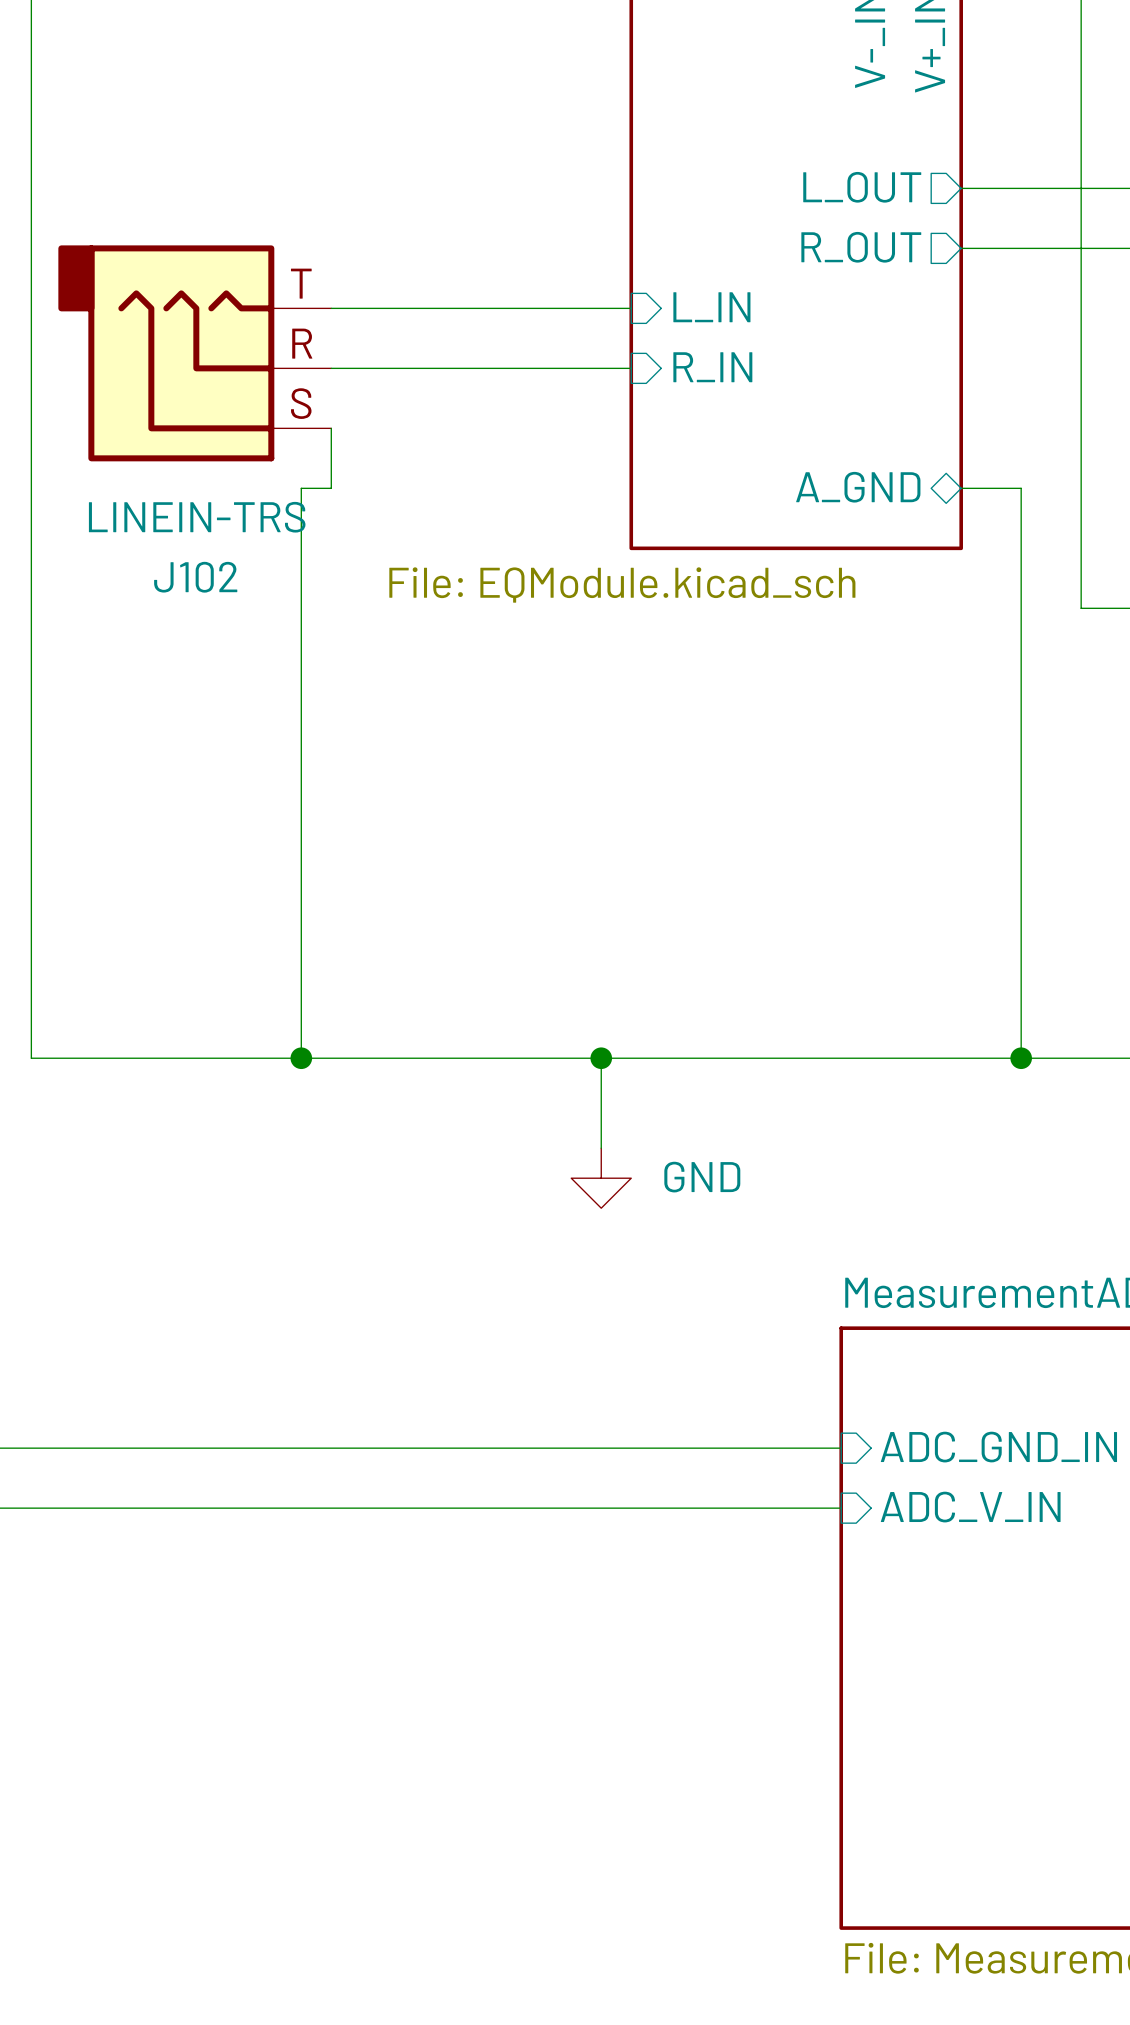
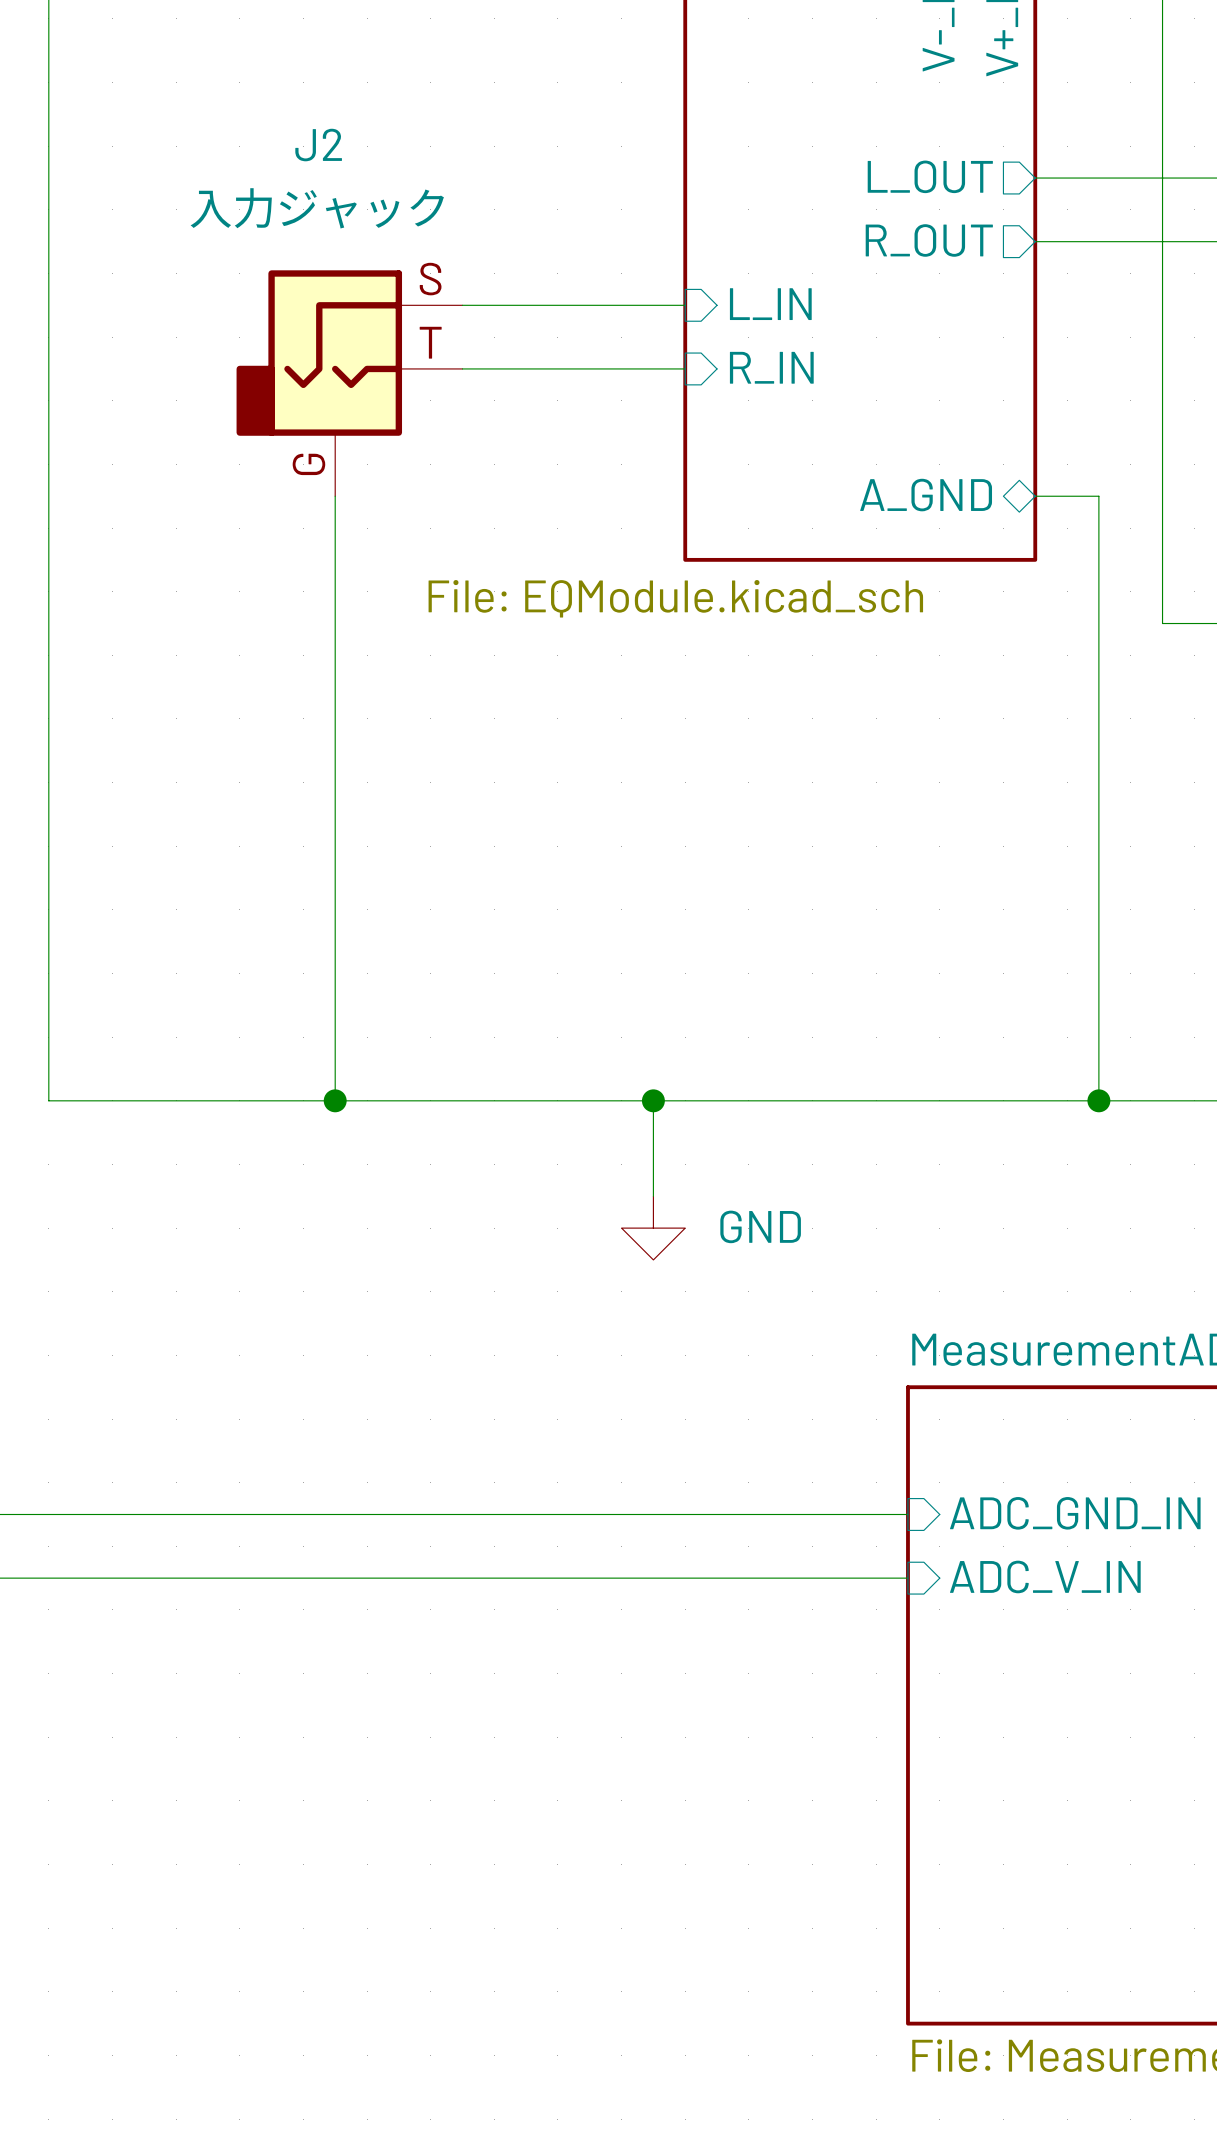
J102: LINEIN-TRS (194, 353) -> none
J2: none -> 入力ジャック (349, 383)
wire: (331, 428) (331, 488) (301, 488) -> none

